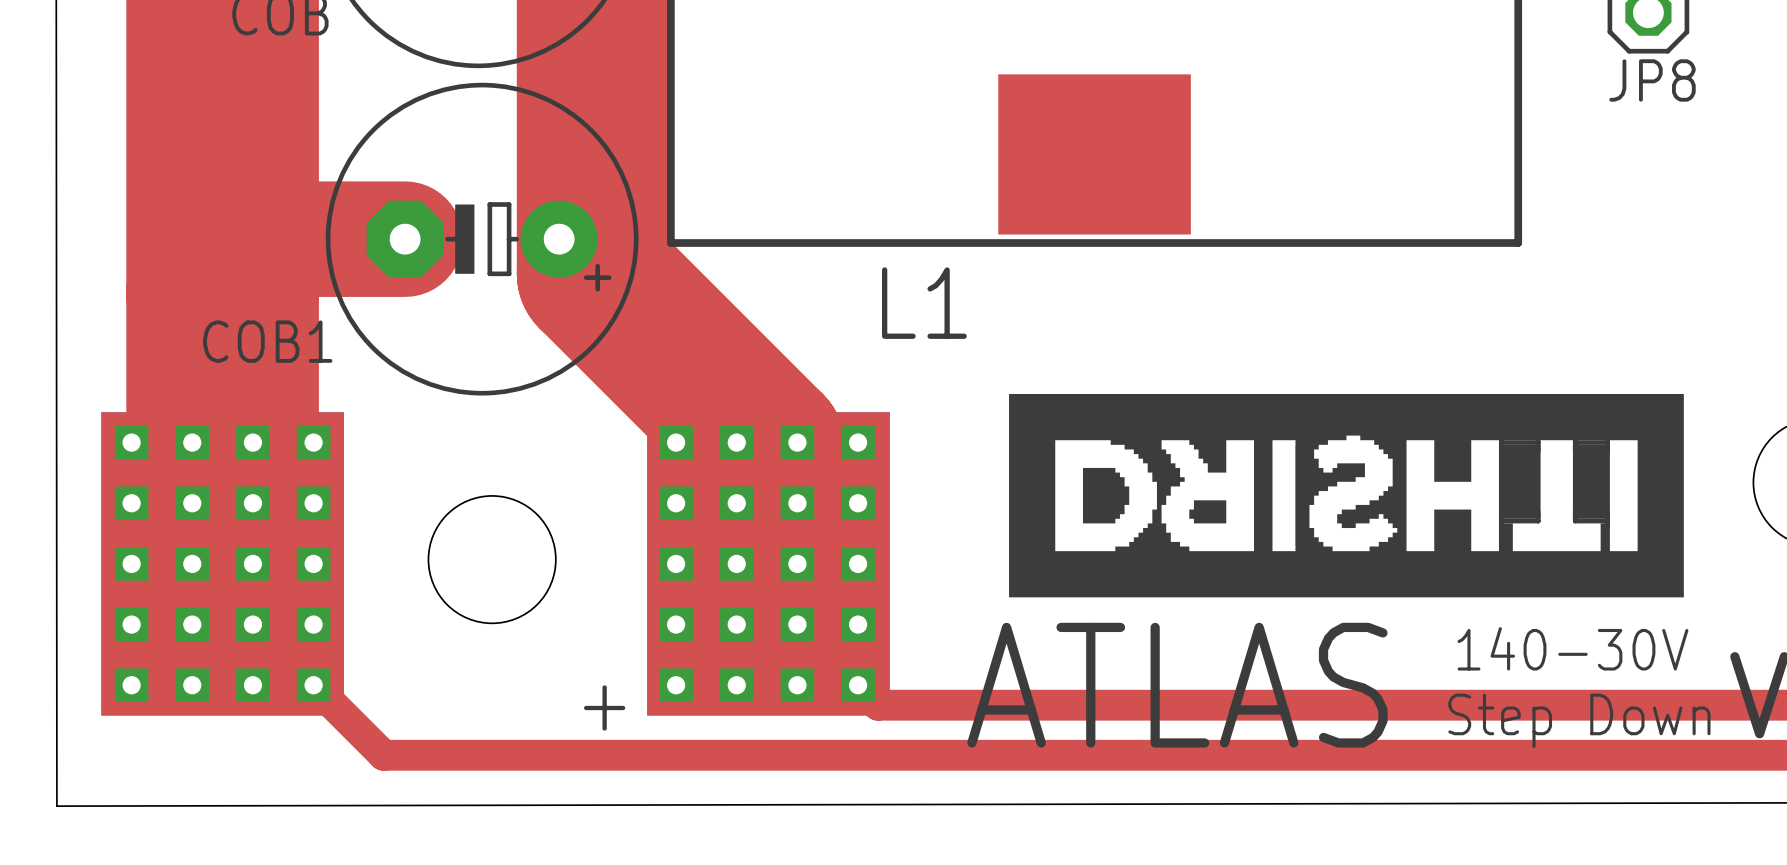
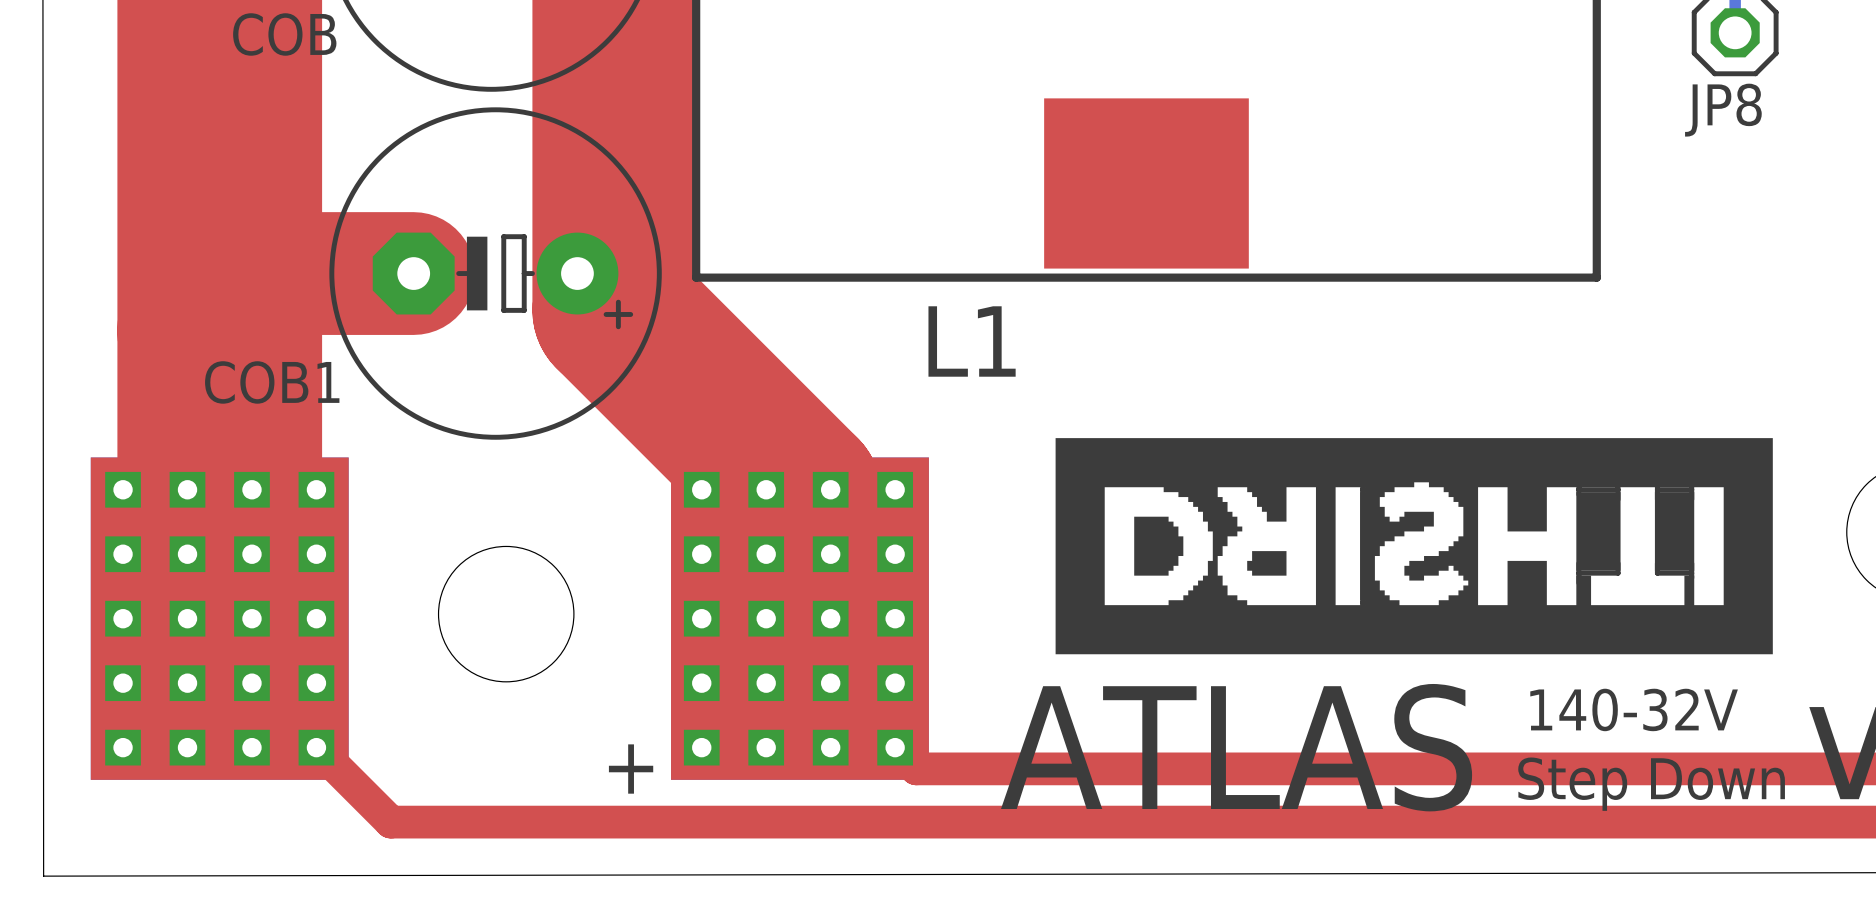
text: 140-30V (1572, 648) -> 140-32V (1634, 709)

